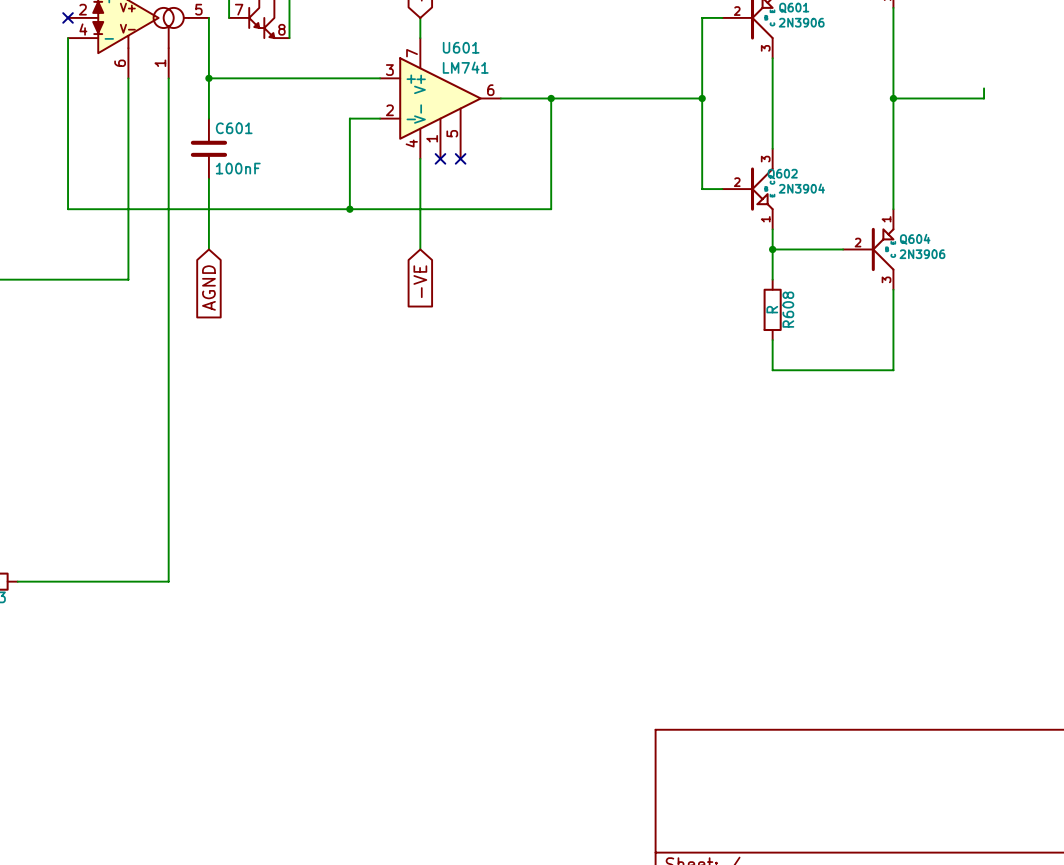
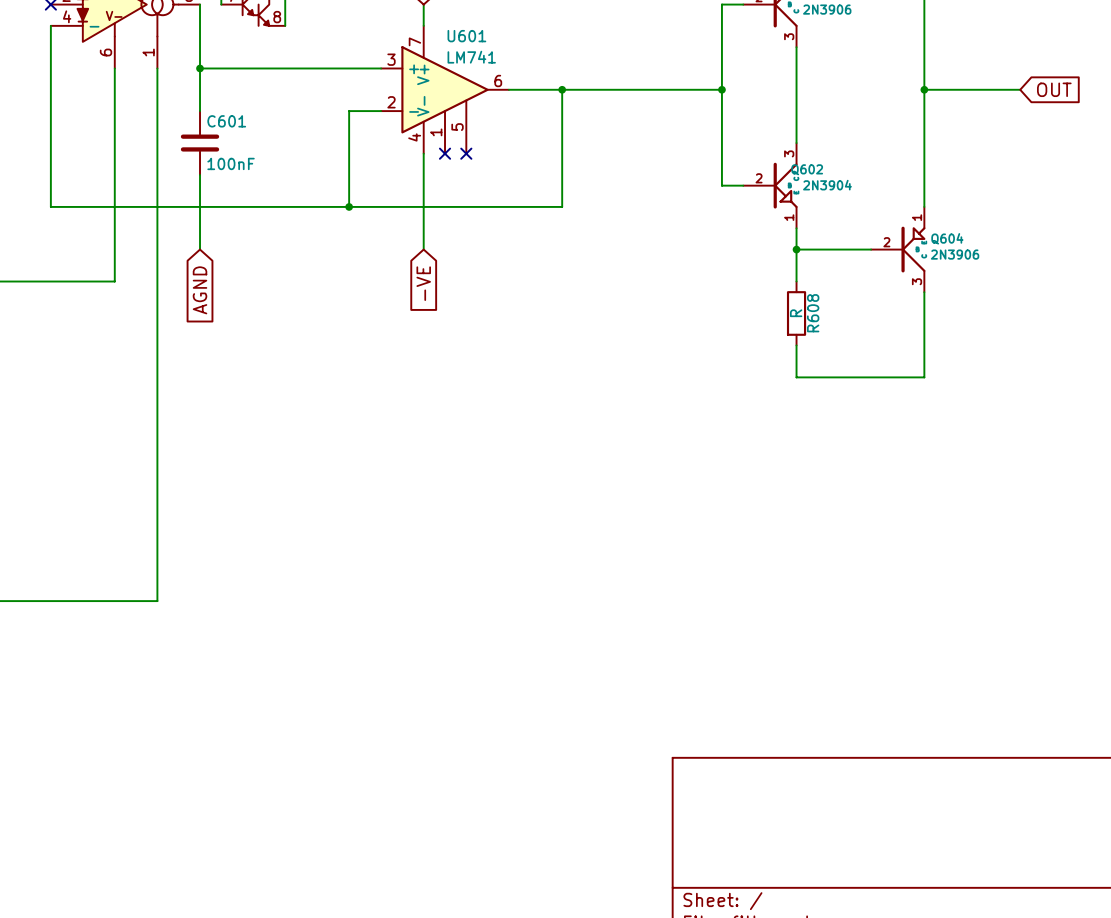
wire: (984, 88) (984, 98) -> none
global label: none -> OUT (1054, 89)

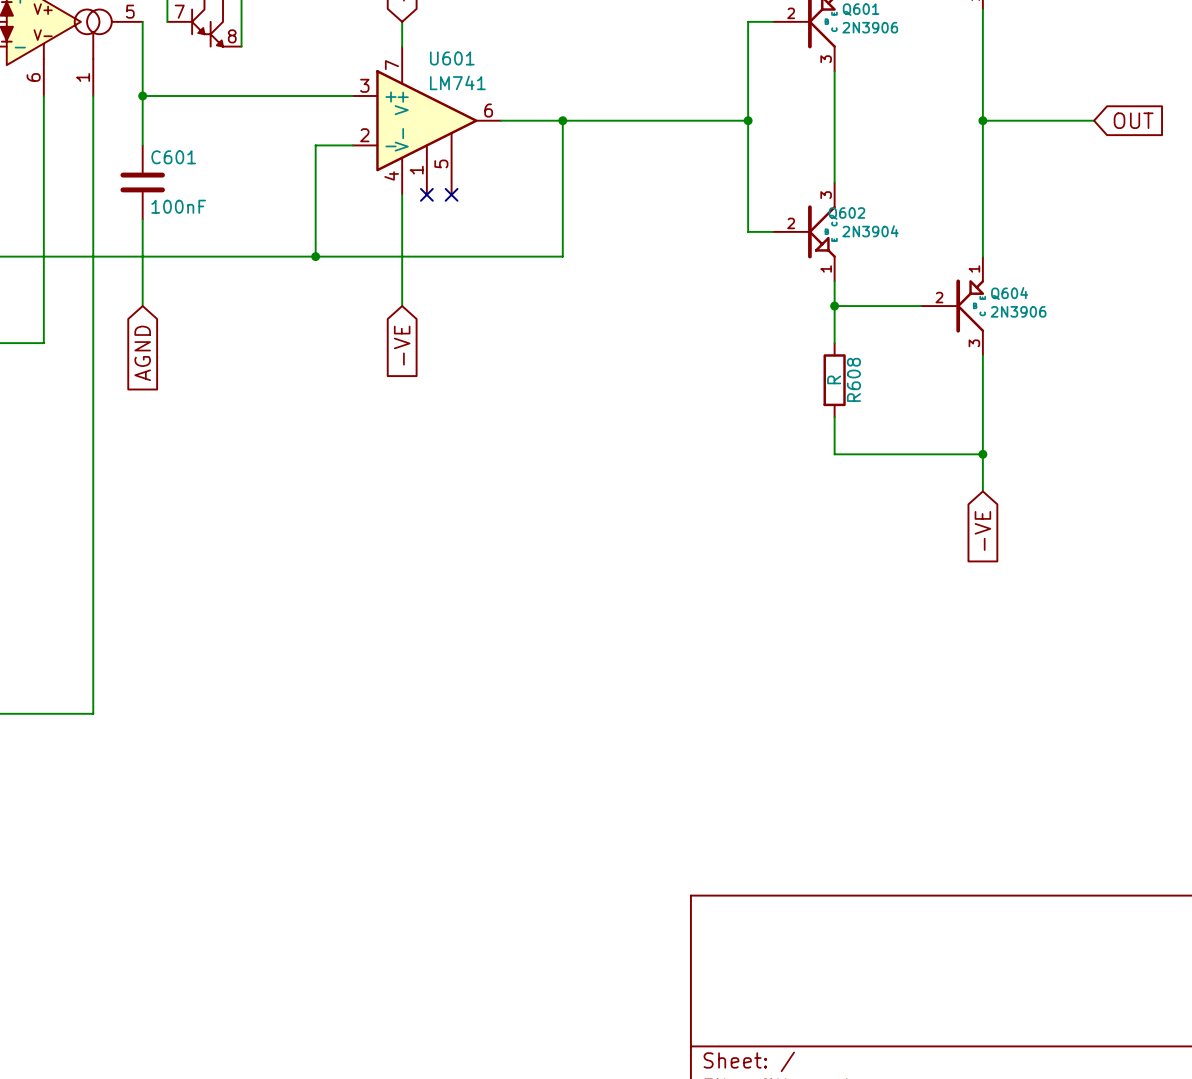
wire: none -> (982, 454) (982, 491)
junction: none -> (982, 454)
global label: none -> -VE (982, 530)

